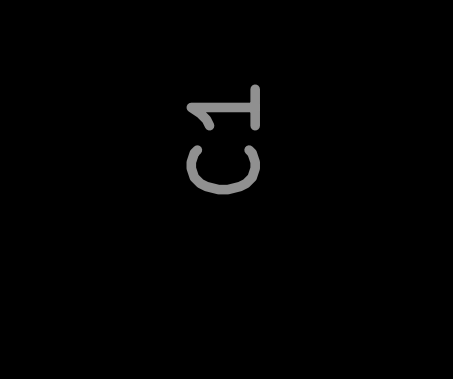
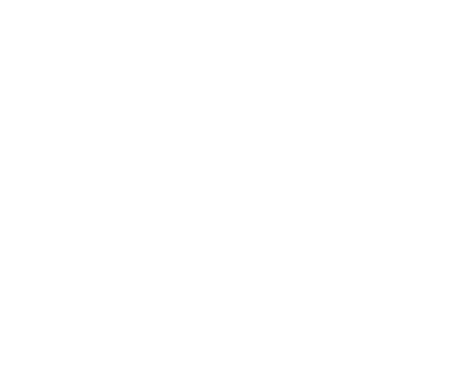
C1: (223, 139) -> none

